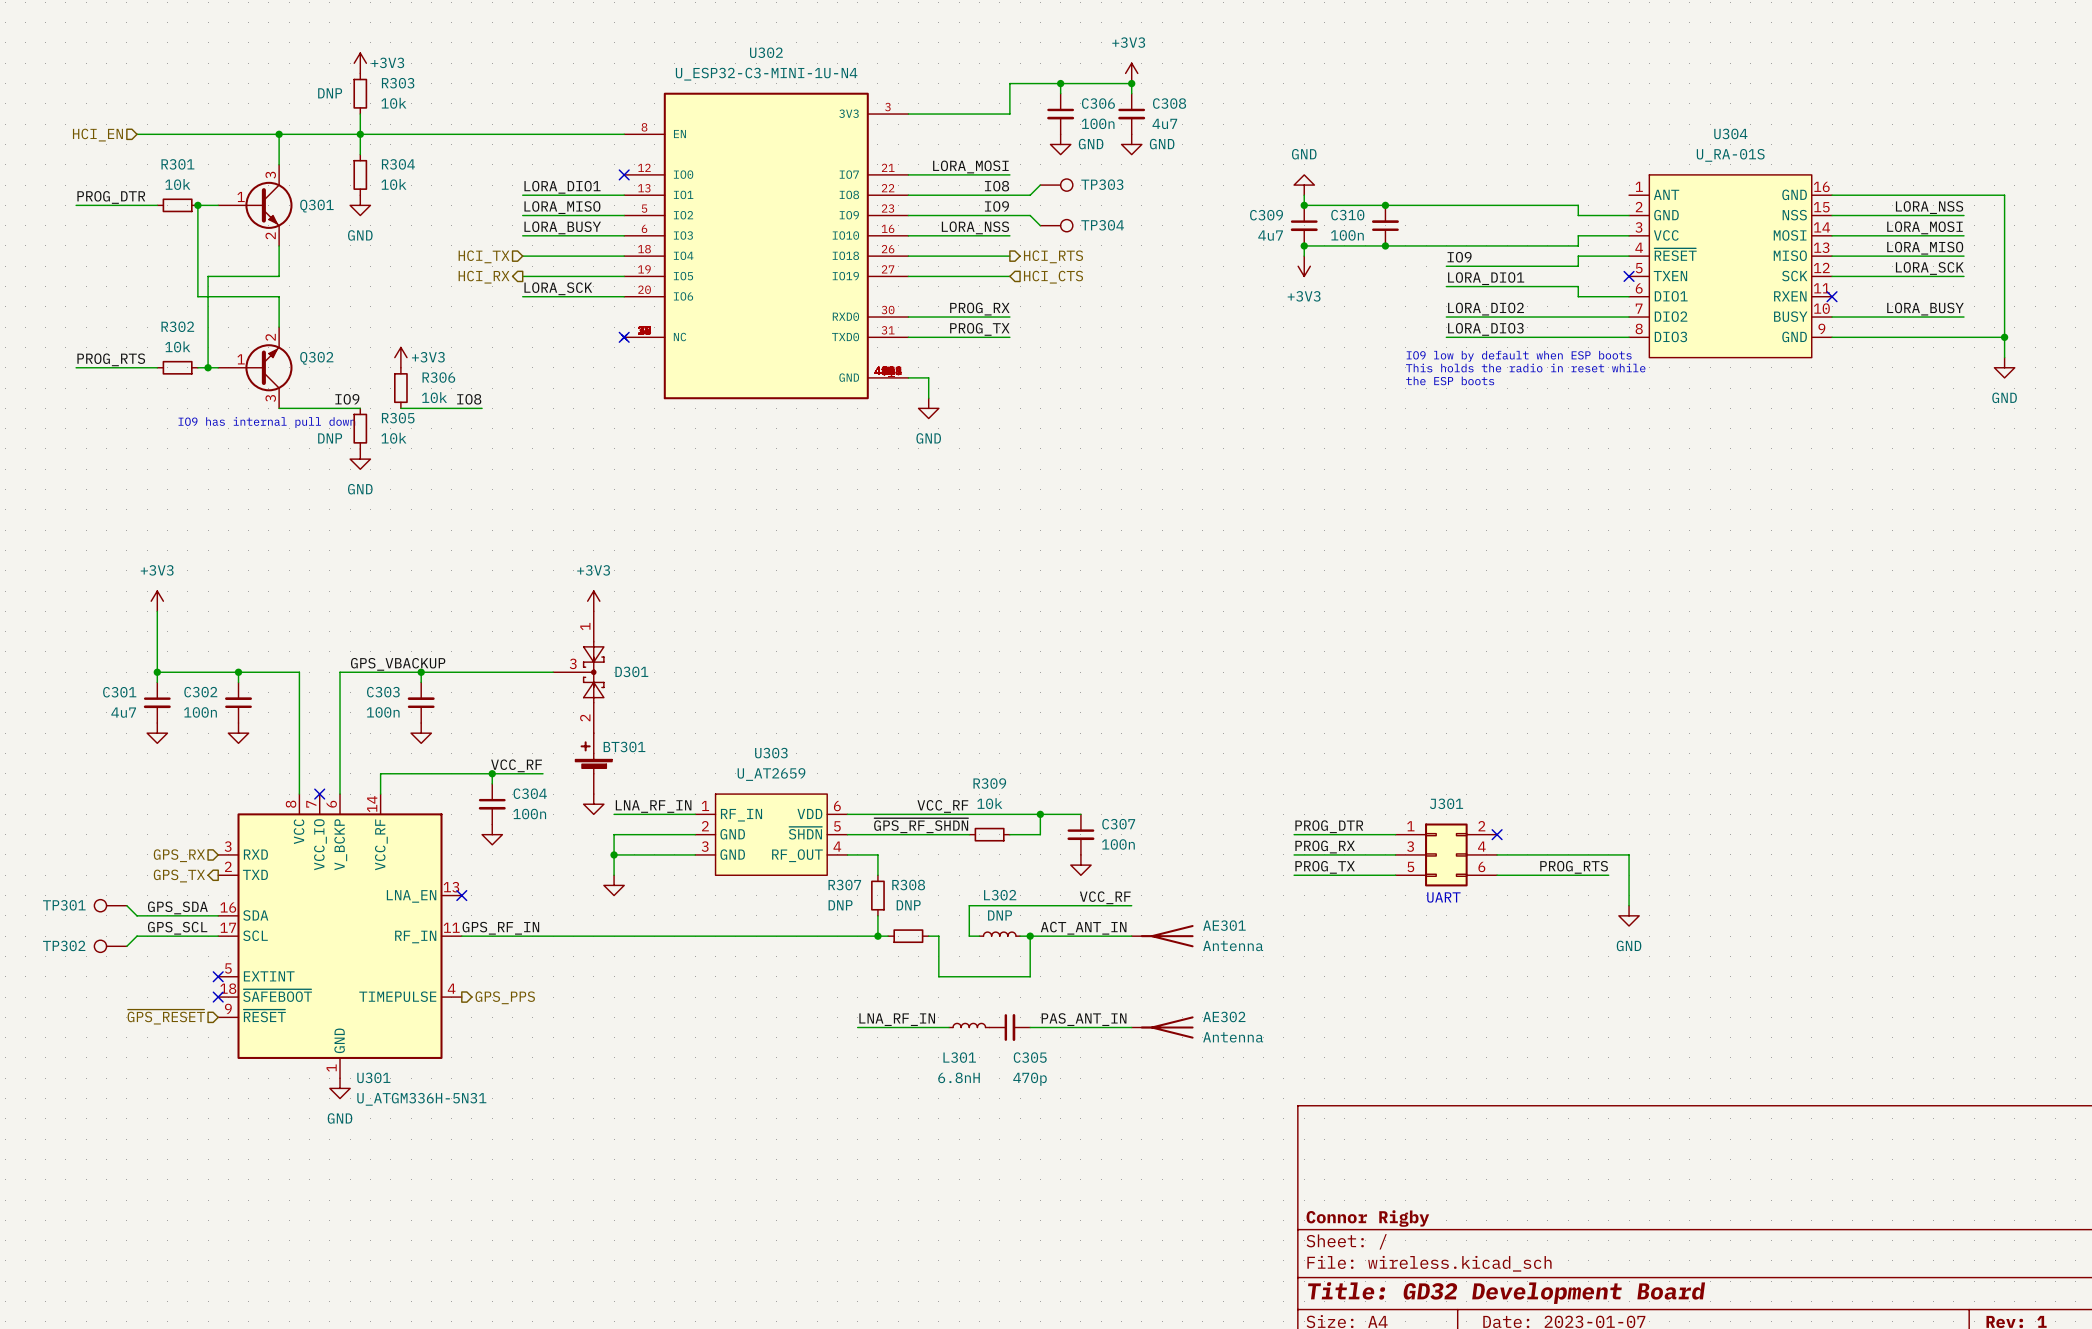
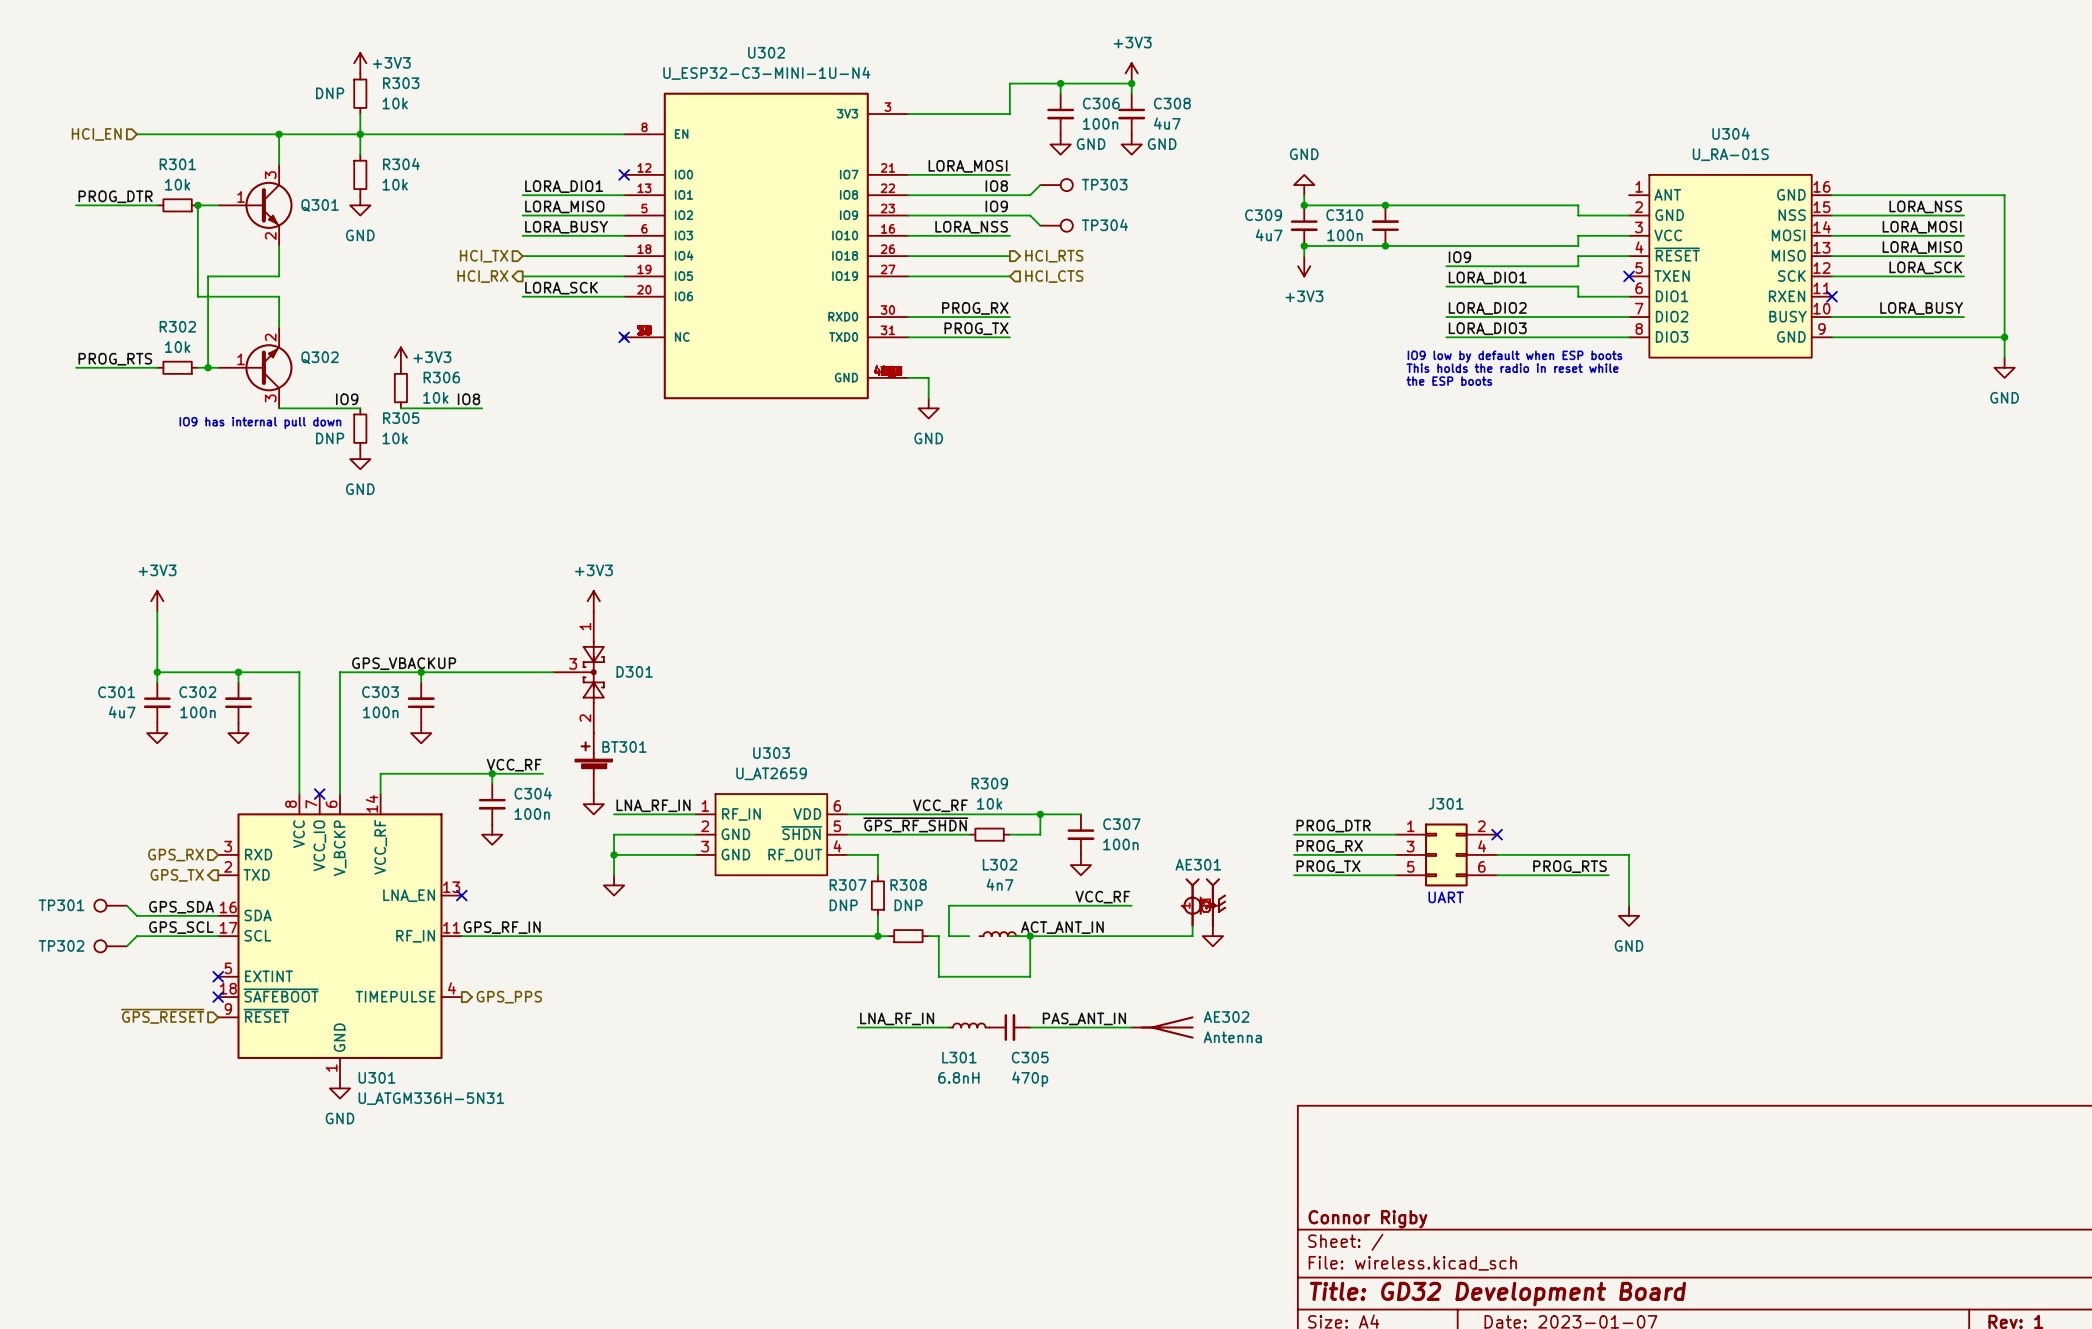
L302 name position: L302 (1000, 895) -> L302 (999, 864)
wire: (969, 905) (969, 936) (979, 936) -> (969, 905) (949, 905) (949, 936) (969, 936)
L302 text: DNP (1000, 915) -> 4n7 (999, 884)
AE301 symbol: [1131, 924, 1194, 948] -> [1183, 878, 1227, 928]
AE301 name position: AE301 (1224, 925) -> AE301 (1198, 864)
label position: ACT_ANT_IN (1083, 928) -> ACT_ANT_IN (1062, 927)
wire: none -> (1009, 936) (1020, 936)
power symbol: none -> (1212, 936)
AE301 value: Antenna (1233, 946) -> none

